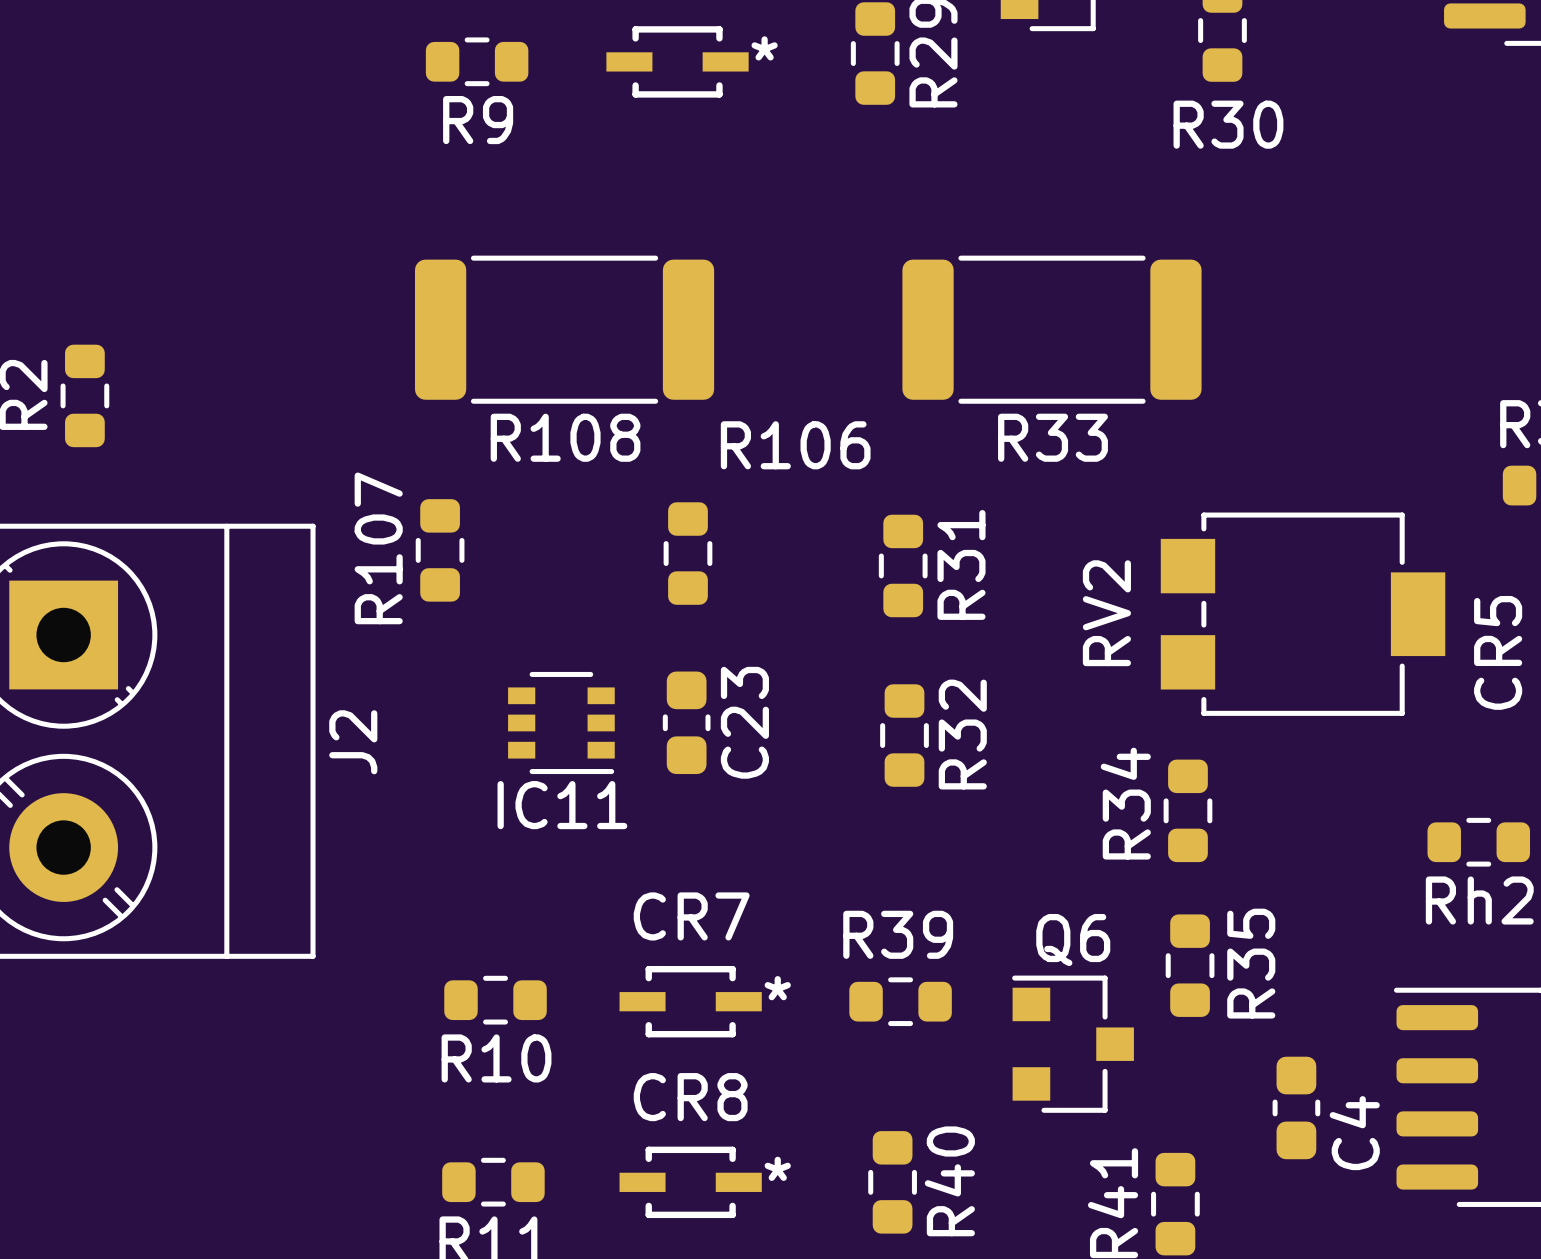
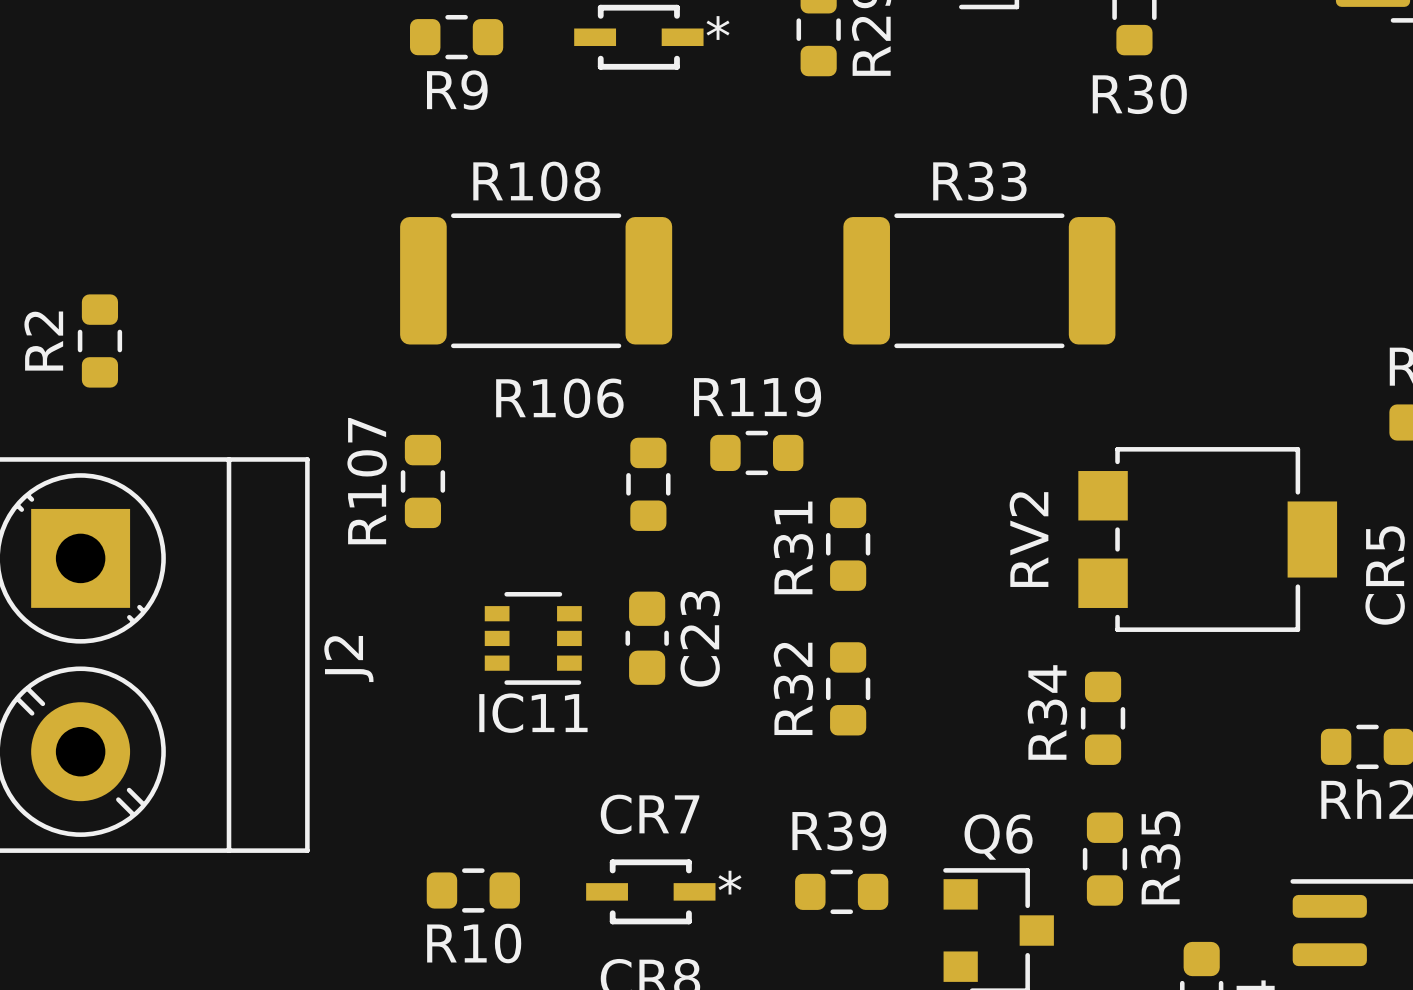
R108 name position: R108 (565, 437) -> R108 (536, 181)
R33 name position: R33 (1052, 437) -> R33 (979, 181)
R106 name position: R106 (795, 445) -> R106 (559, 398)
R119: none -> (756, 452)
R31 name position: R31 (961, 564) -> R31 (793, 547)
R31 position: (903, 565) -> (848, 544)
R32 name position: R32 (962, 734) -> R32 (793, 688)
R32 position: (904, 735) -> (848, 688)

